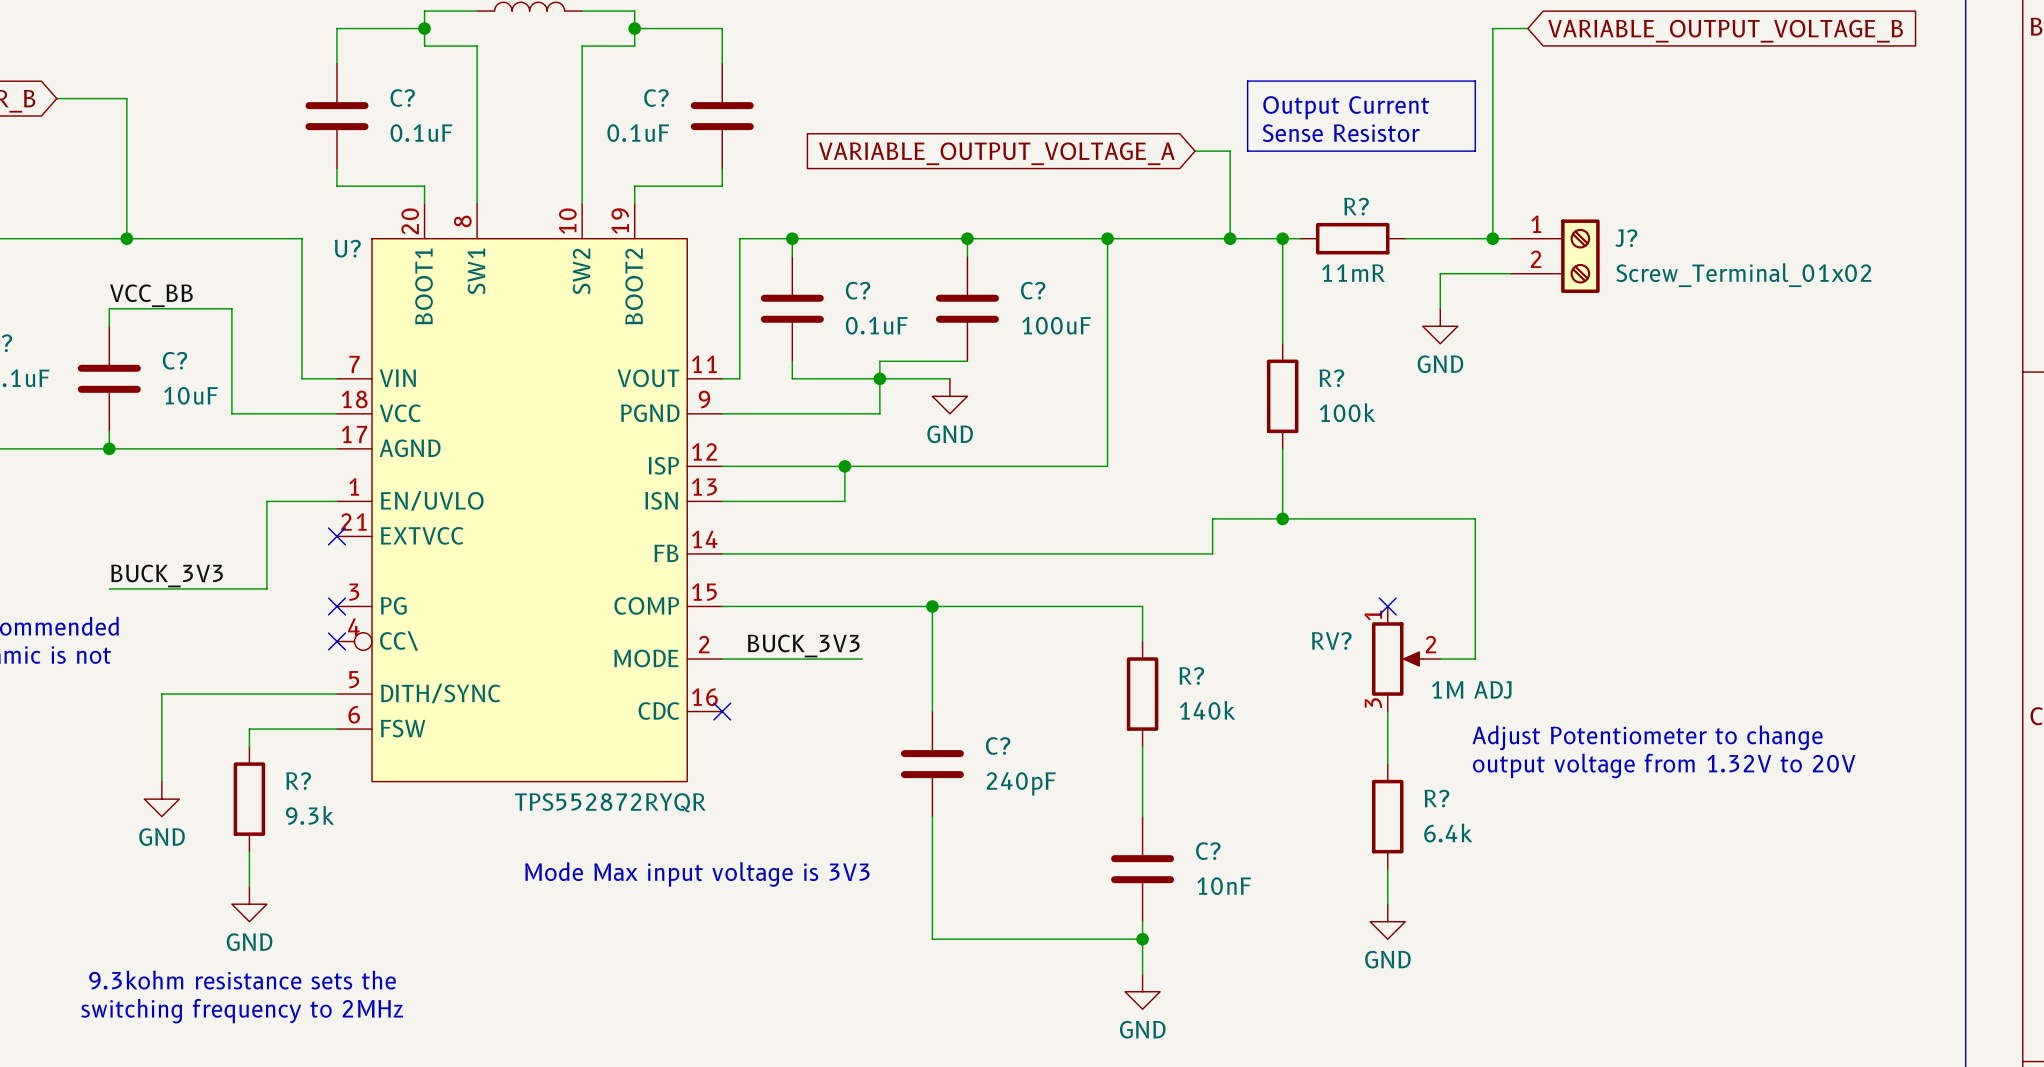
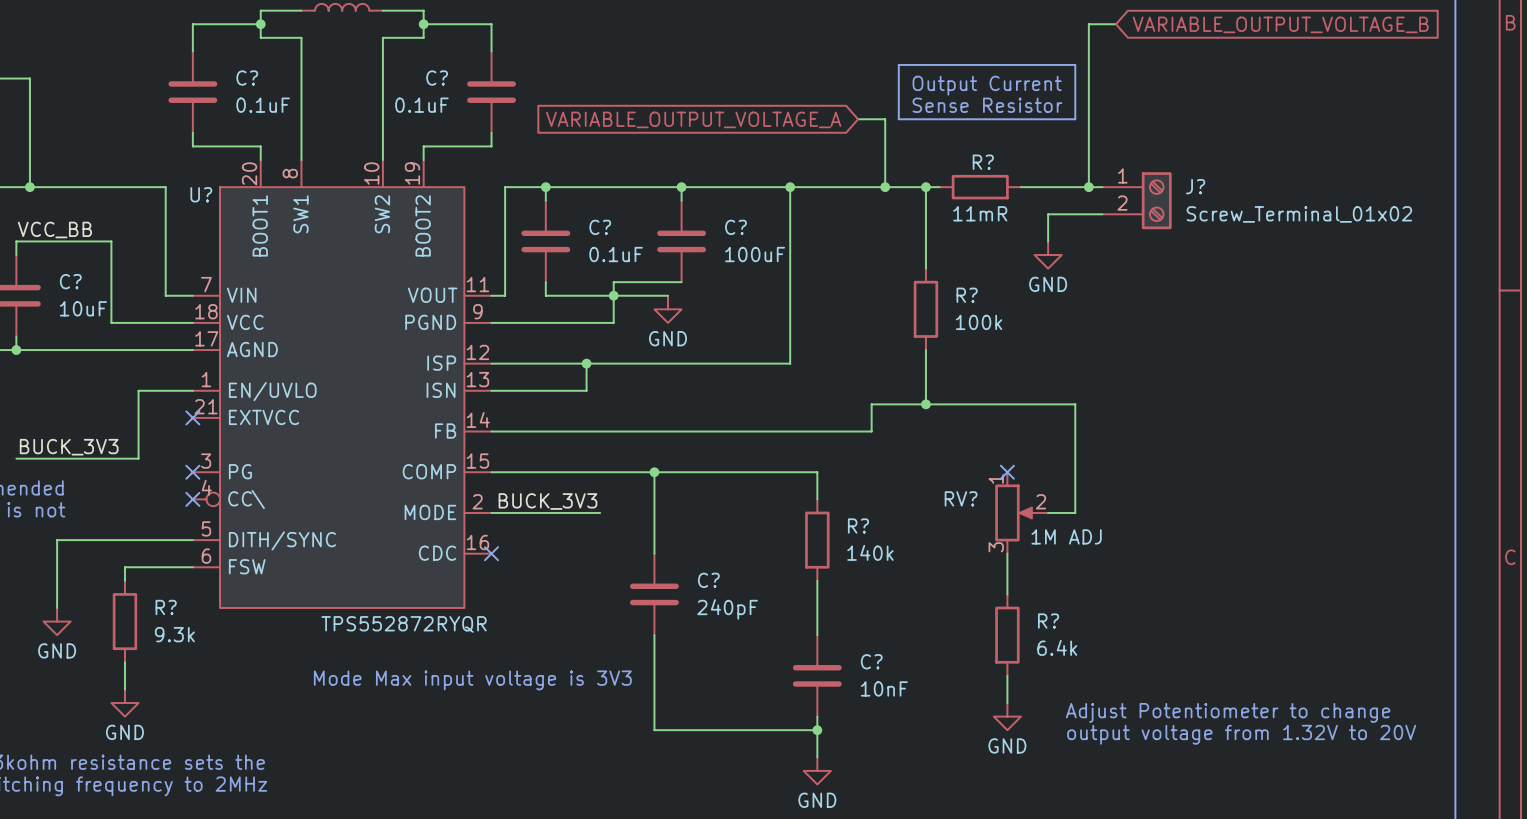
text position: Adjust Potentiometer to change (1647, 737) -> Adjust Potentiometer to change (1228, 712)
text position: output voltage from 1.32V to 20V (1664, 765) -> output voltage from 1.32V to 20V (1241, 734)

